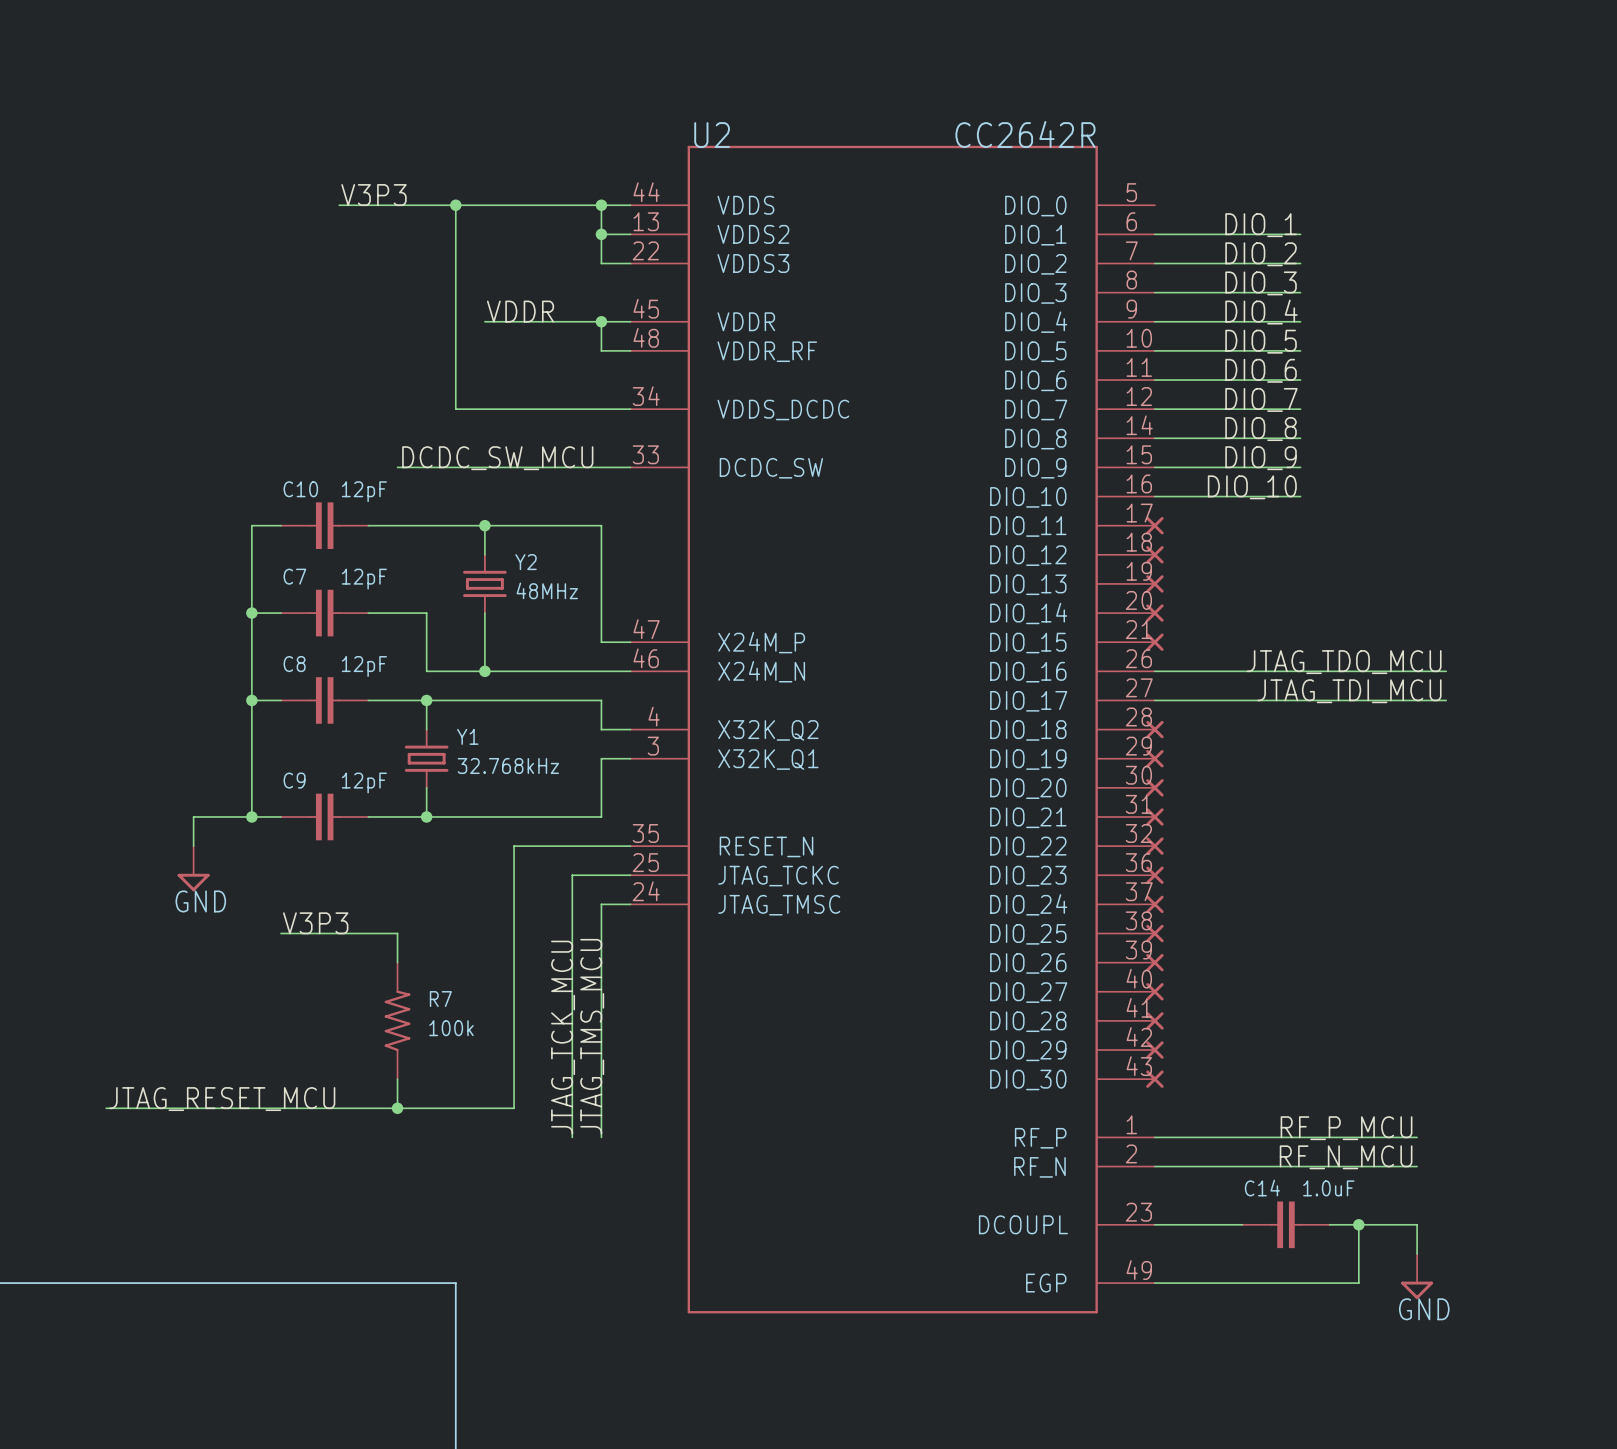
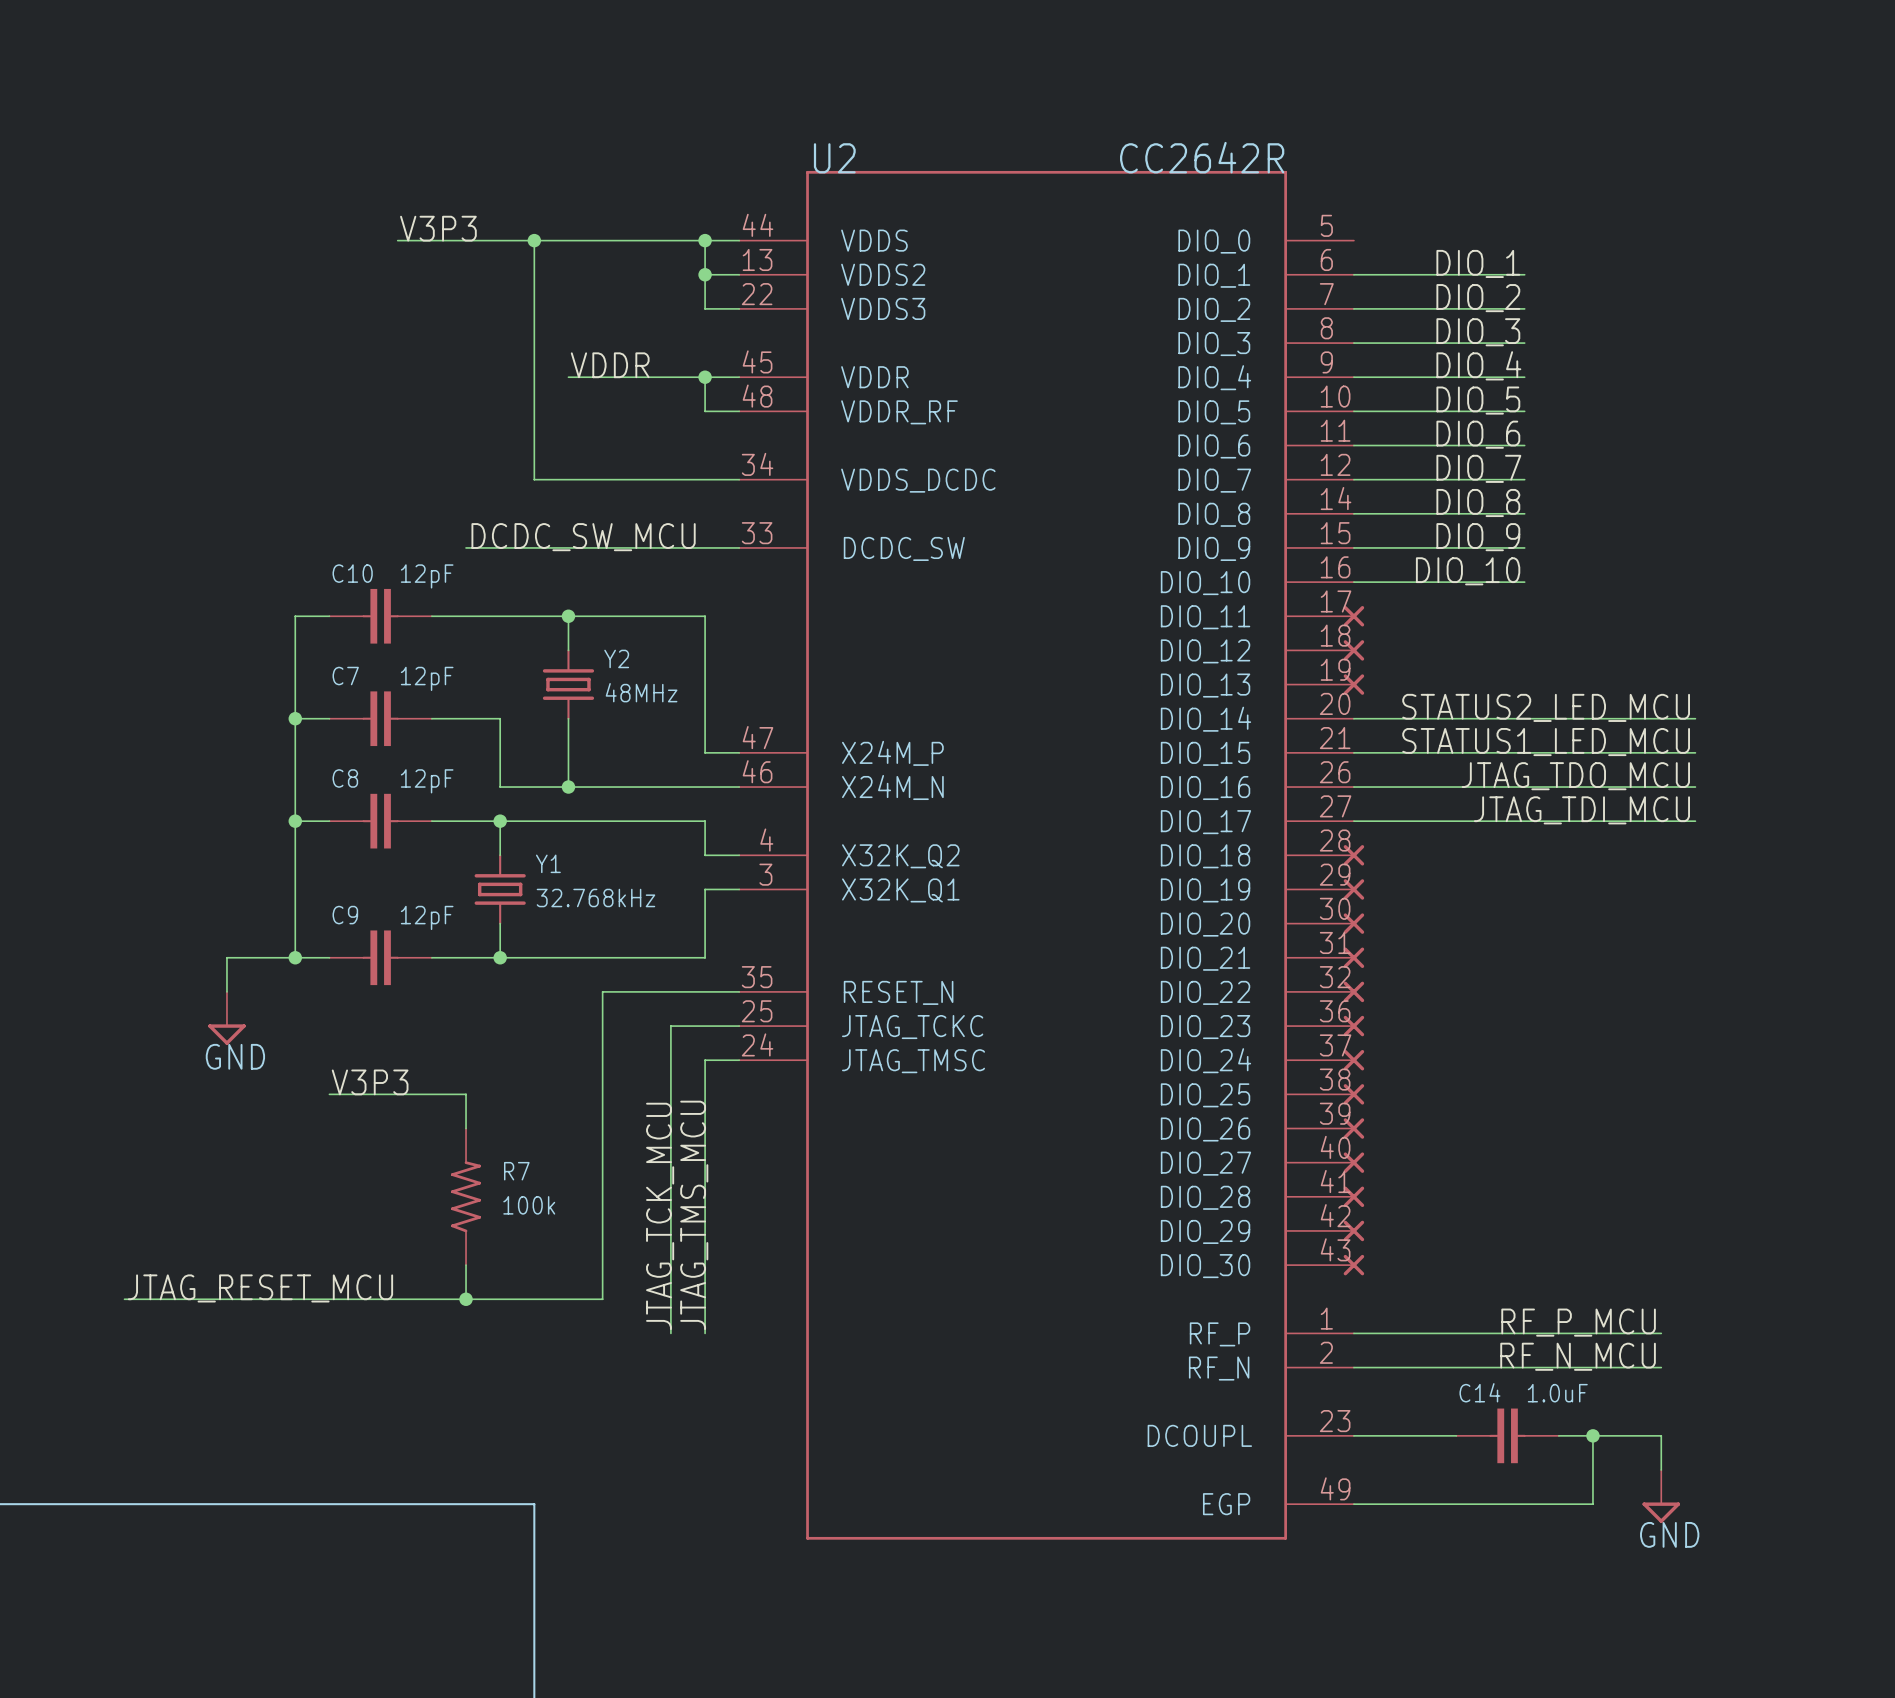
label: none -> STATUS2_LED_MCU (1546, 707)
wire: none -> (1353, 718) (1695, 718)
part: (1154, 613) -> none
label: none -> STATUS1_LED_MCU (1546, 742)
wire: none -> (1353, 752) (1695, 752)
part: (1154, 642) -> none

